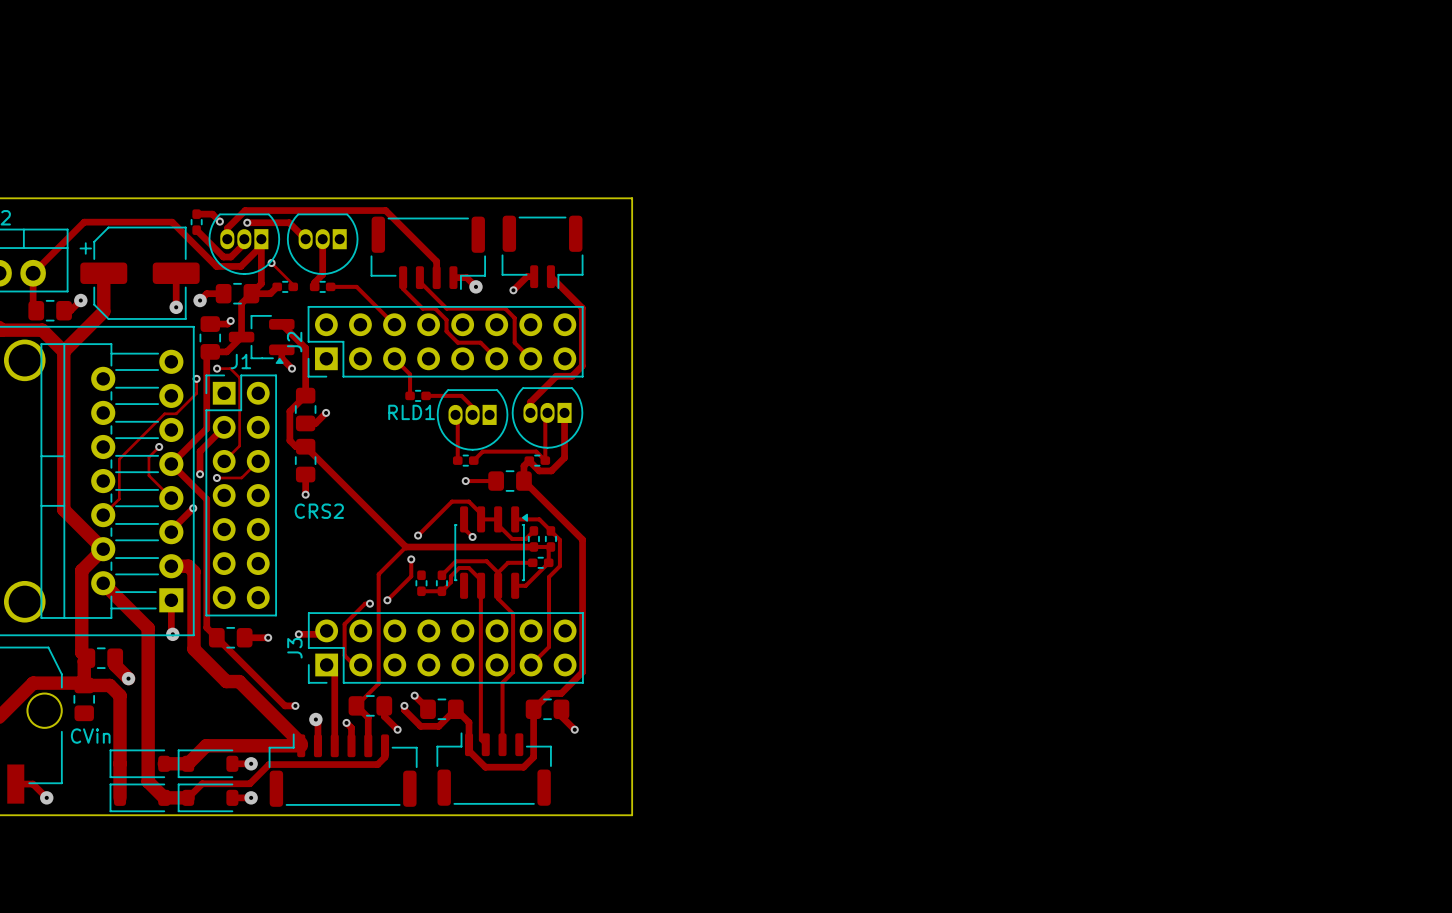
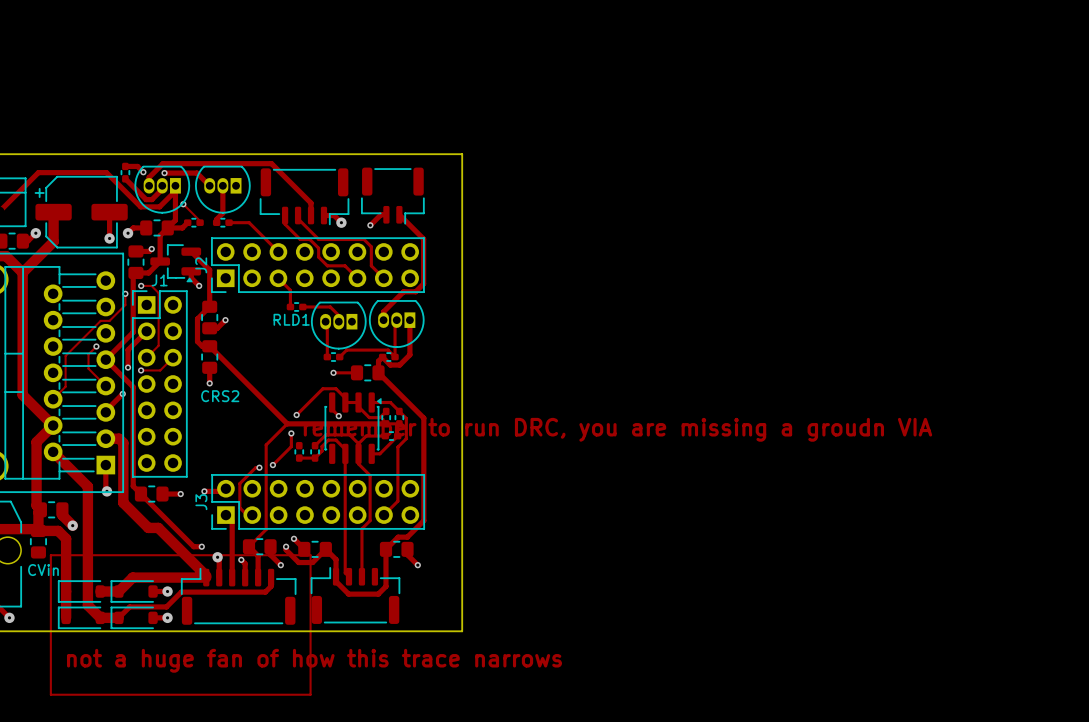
text: none -> remember to run DRC, you are missing a groudn VIA (617, 429)
track: none -> (50, 555) (310, 555) (310, 694) (50, 694) (50, 555)
text: none -> not a huge fan of how this trace narrows (314, 660)

